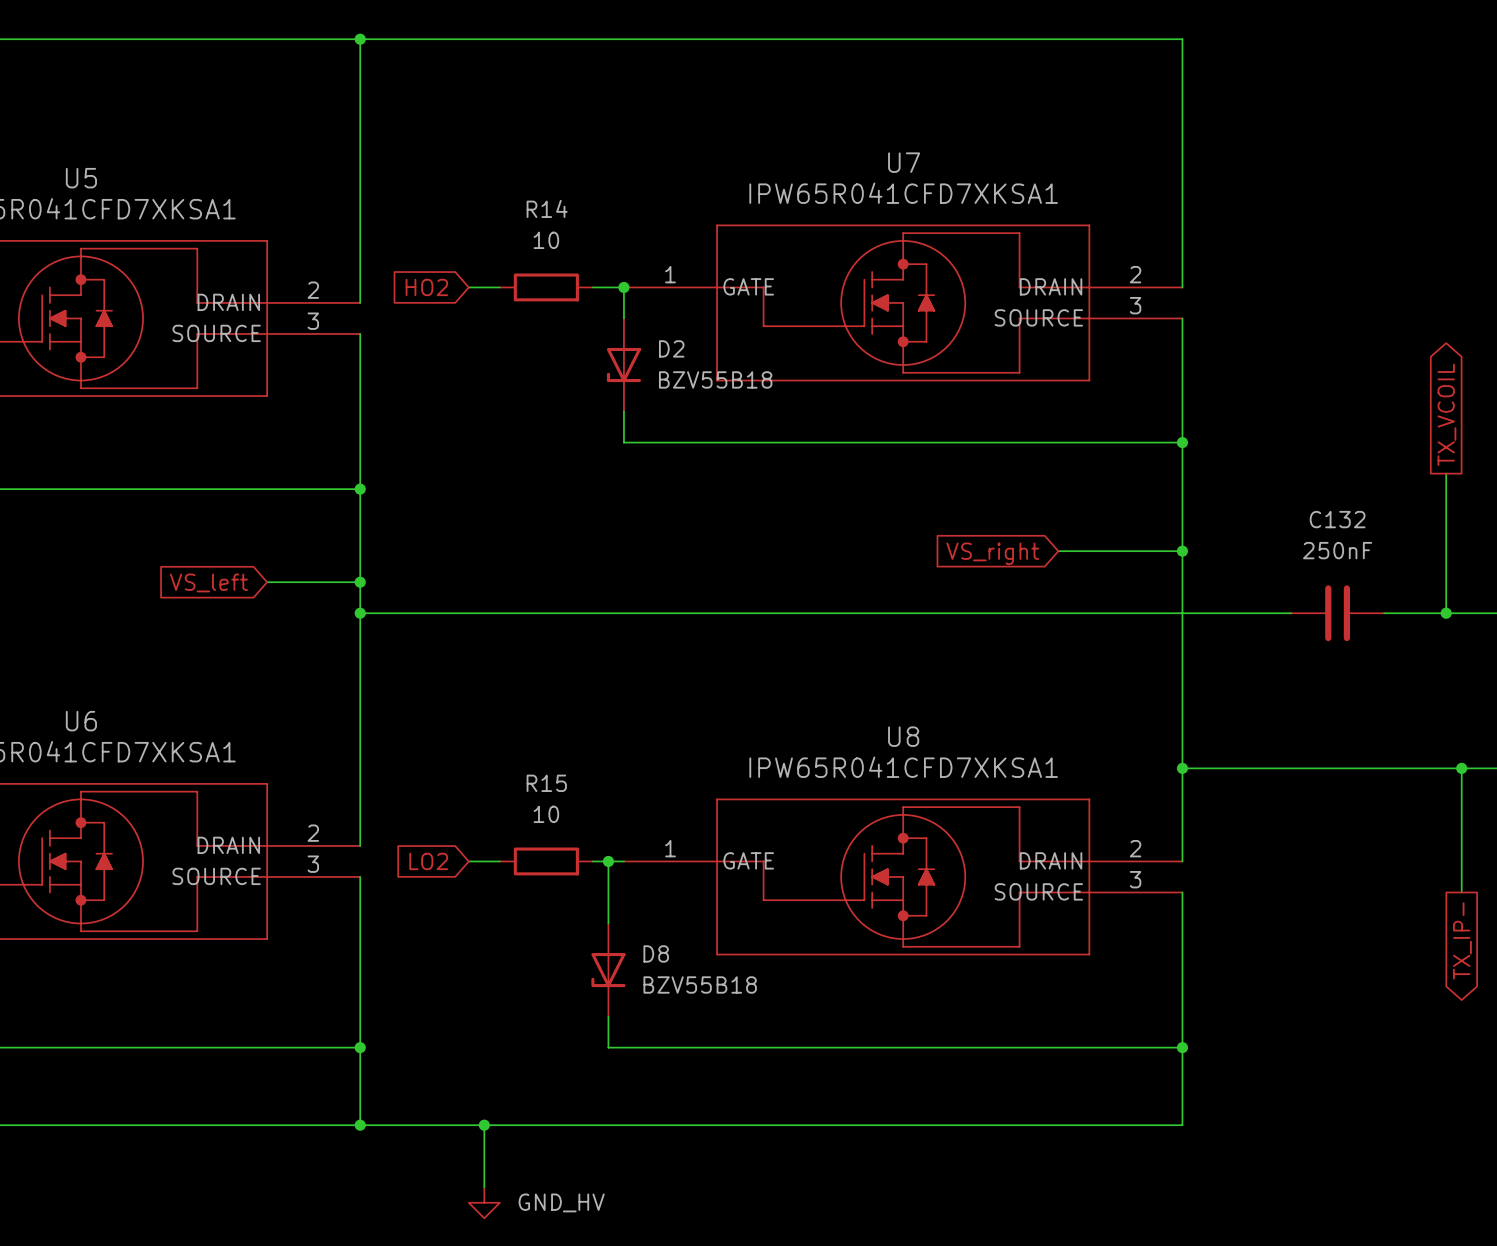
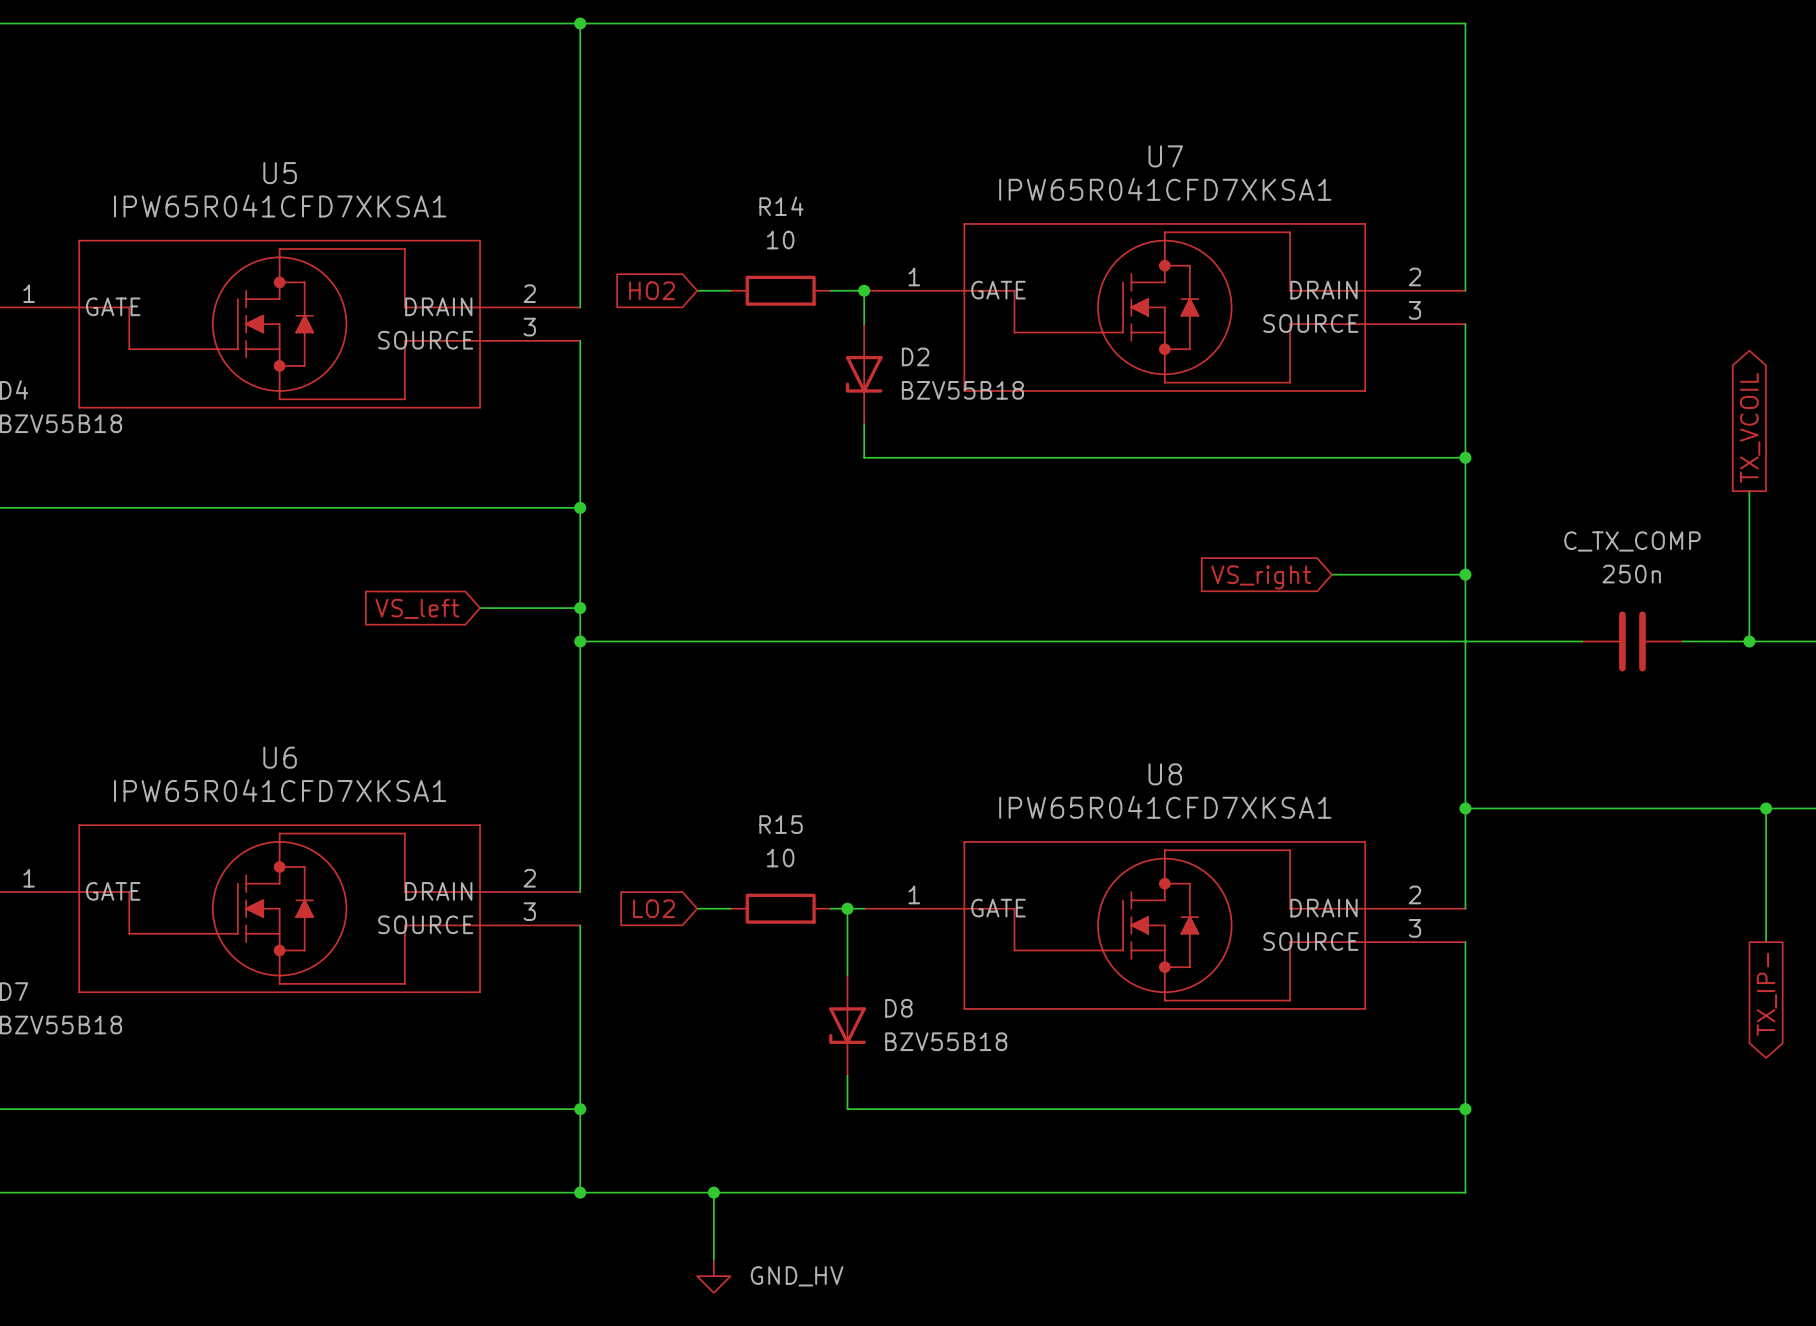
C132 name: C132 (1337, 519) -> C_TX_COMP (1632, 541)
C132 value: 250nF (1337, 550) -> 250n (1631, 574)

